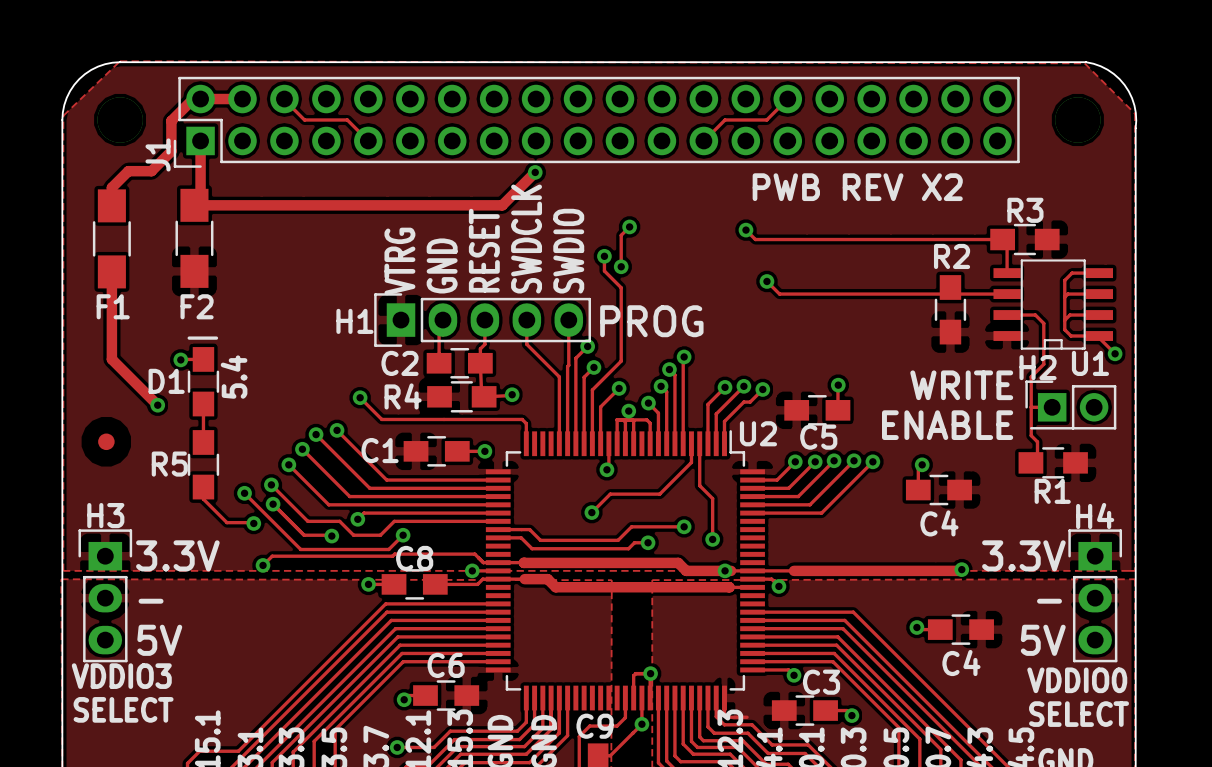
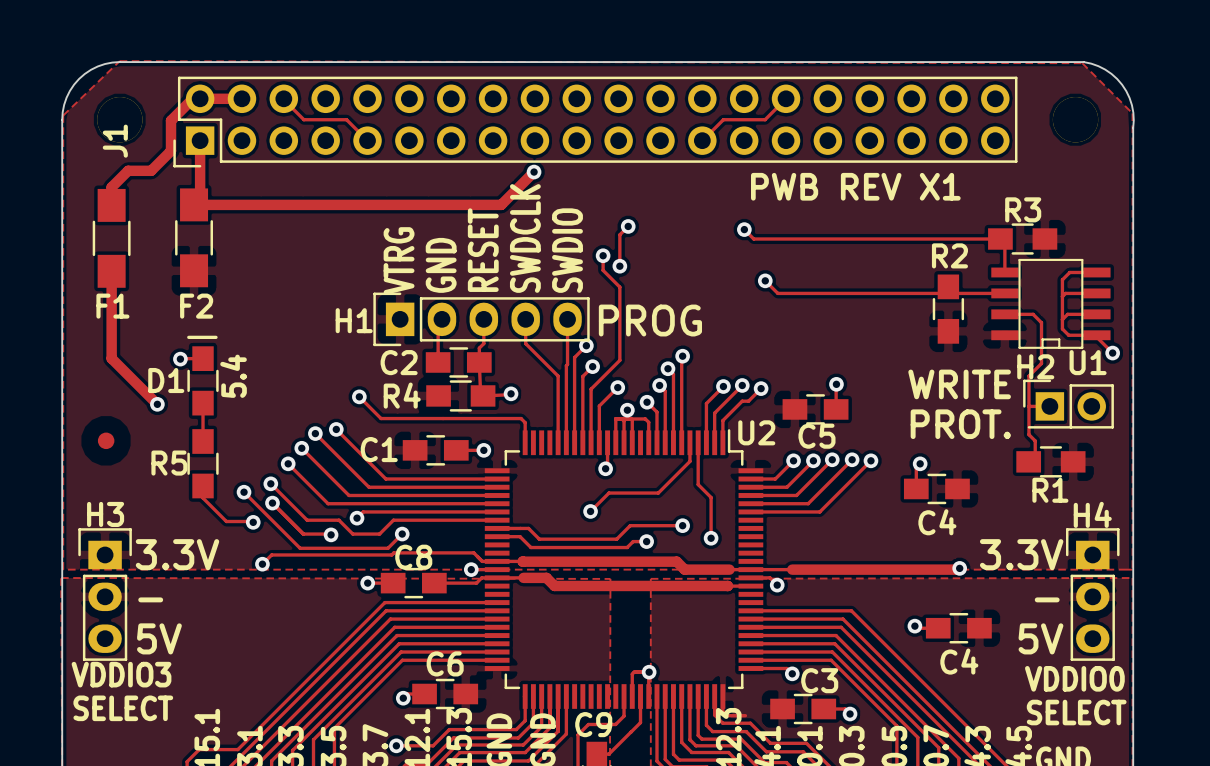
J1 name position: J1 (158, 154) -> J1 (115, 141)
text: PWB REV X2 (857, 187) -> PWB REV X1 (855, 186)
text: ENABLE (947, 425) -> PROT. (960, 424)
via: (725, 570) -> none
via: (641, 724) -> none

